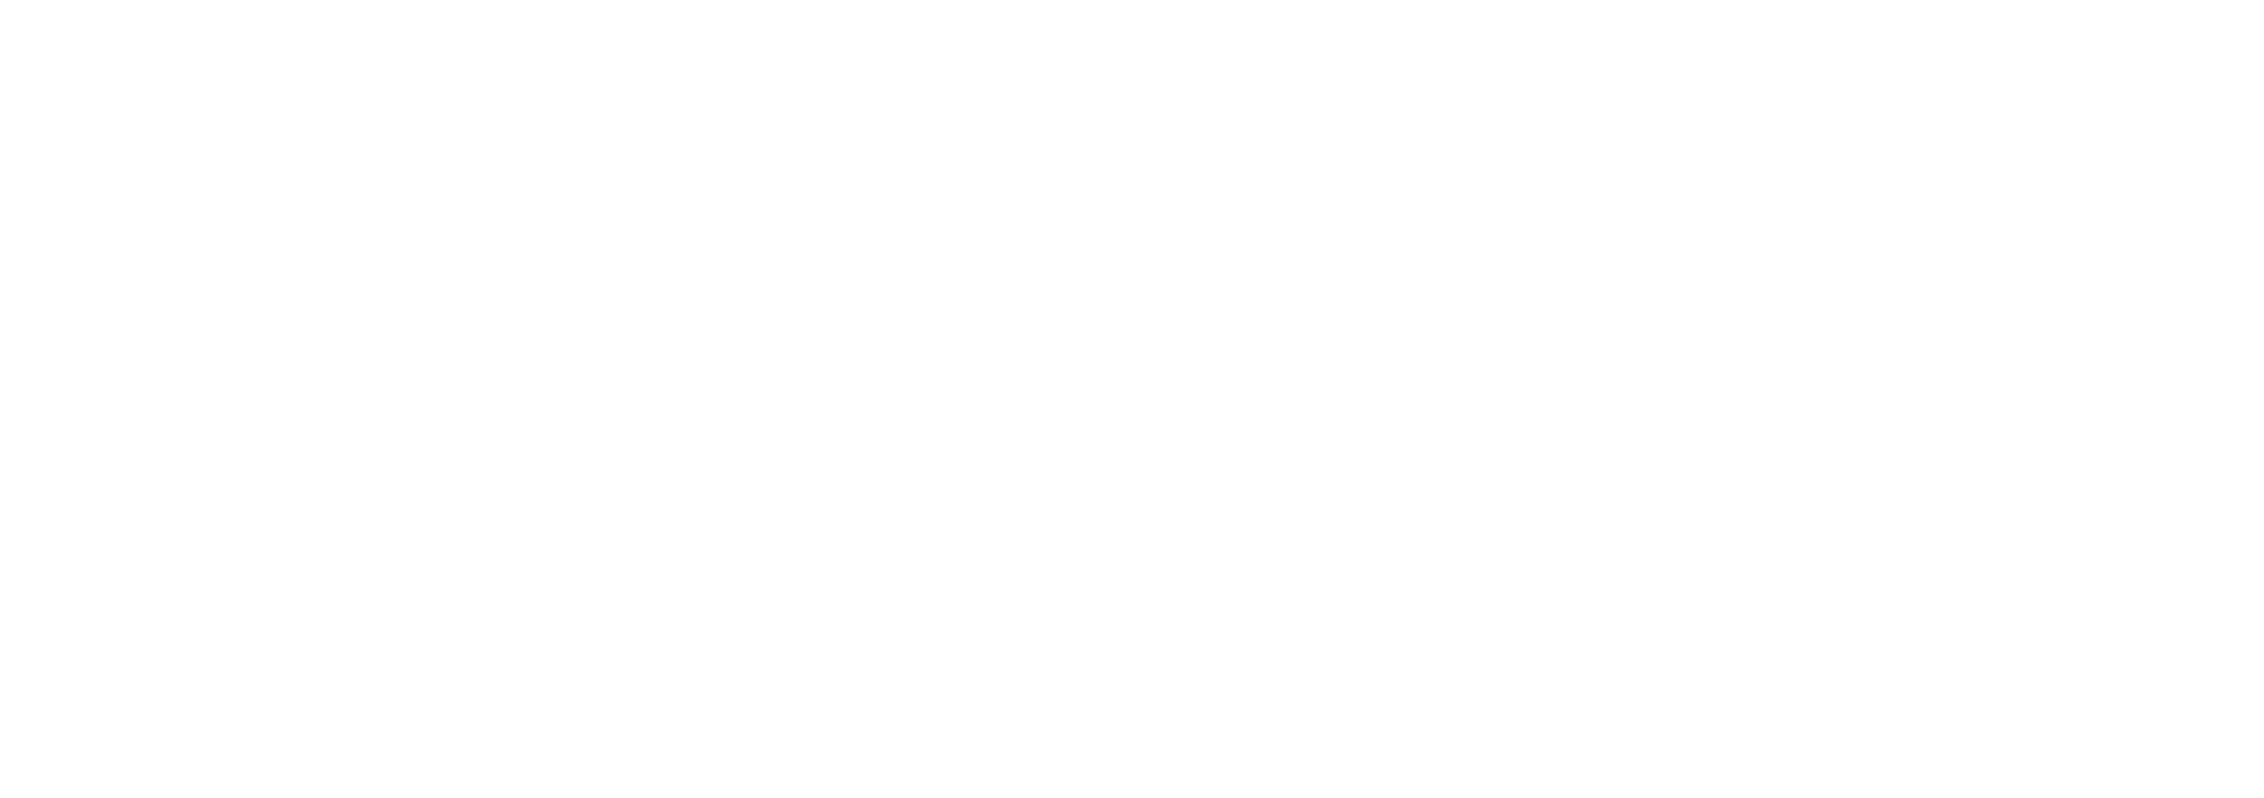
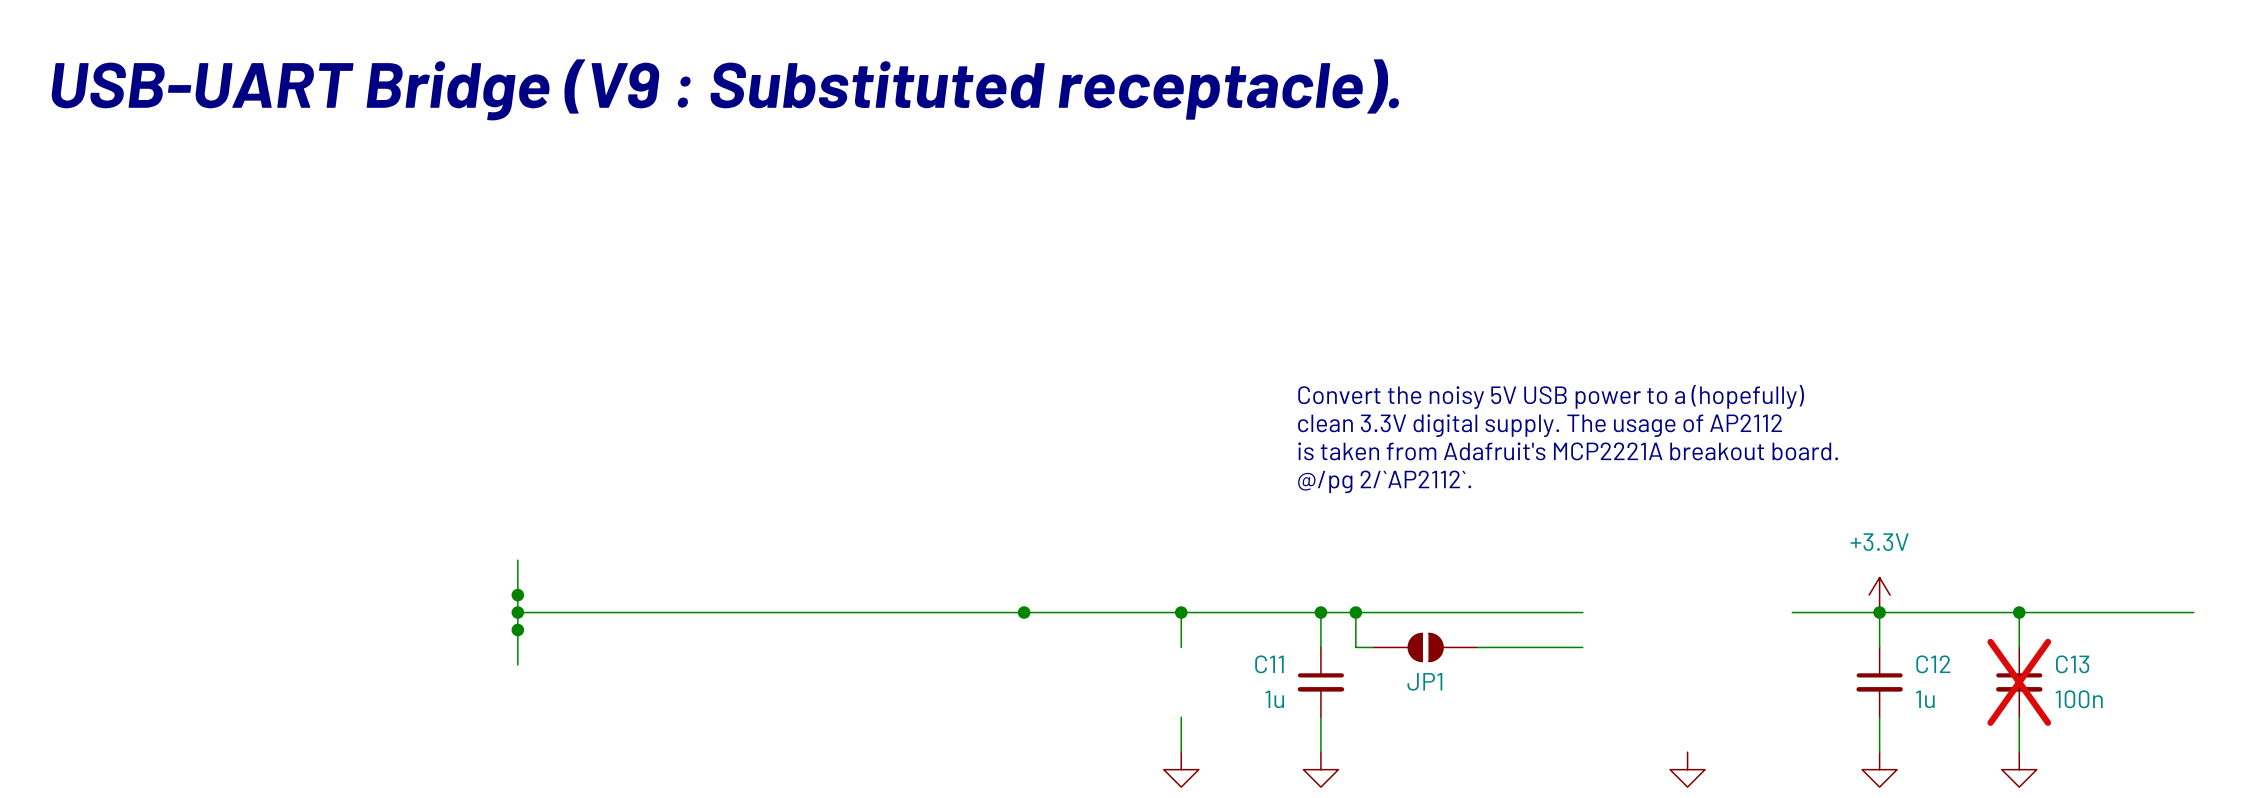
text: none -> USB-UART Bridge (V9 : Substituted receptacle). (725, 89)
text: none -> Convert the noisy 5V USB power to a (hopefully) (1551, 396)
text: none -> clean 3.3V digital supply. The usage of AP2112 (1540, 425)
text: none -> is taken from Adafruit's MCP2221A breakout board. (1568, 451)
text: none -> @/pg 2/`AP2112`. (1384, 481)
wire: none -> (517, 560) (517, 664)
junction: none -> (517, 595)
power symbol: none -> +3.3V (1879, 595)
wire: none -> (517, 612) (1582, 612)
junction: none -> (517, 612)
junction: none -> (1024, 612)
wire: none -> (1181, 612) (1181, 647)
junction: none -> (1181, 612)
wire: none -> (1320, 612) (1320, 647)
junction: none -> (1320, 612)
wire: none -> (1355, 612) (1355, 647) (1373, 647)
junction: none -> (1355, 612)
wire: none -> (1792, 612) (2193, 612)
wire: none -> (1879, 612) (1879, 647)
junction: none -> (1879, 612)
wire: none -> (2019, 612) (2019, 647)
junction: none -> (2019, 612)
junction: none -> (517, 629)
JP1: none -> (1425, 647)
wire: none -> (1478, 647) (1582, 647)
C11: none -> 1u (1320, 682)
C12: none -> 1u (1879, 682)
C13: none -> 100n (2019, 682)
wire: none -> (1181, 717) (1181, 752)
wire: none -> (1320, 717) (1320, 752)
wire: none -> (1879, 717) (1879, 752)
wire: none -> (2019, 717) (2019, 752)
power symbol: none -> (1181, 769)
power symbol: none -> (1320, 769)
power symbol: none -> (1687, 769)
power symbol: none -> (1879, 769)
power symbol: none -> (2019, 769)

